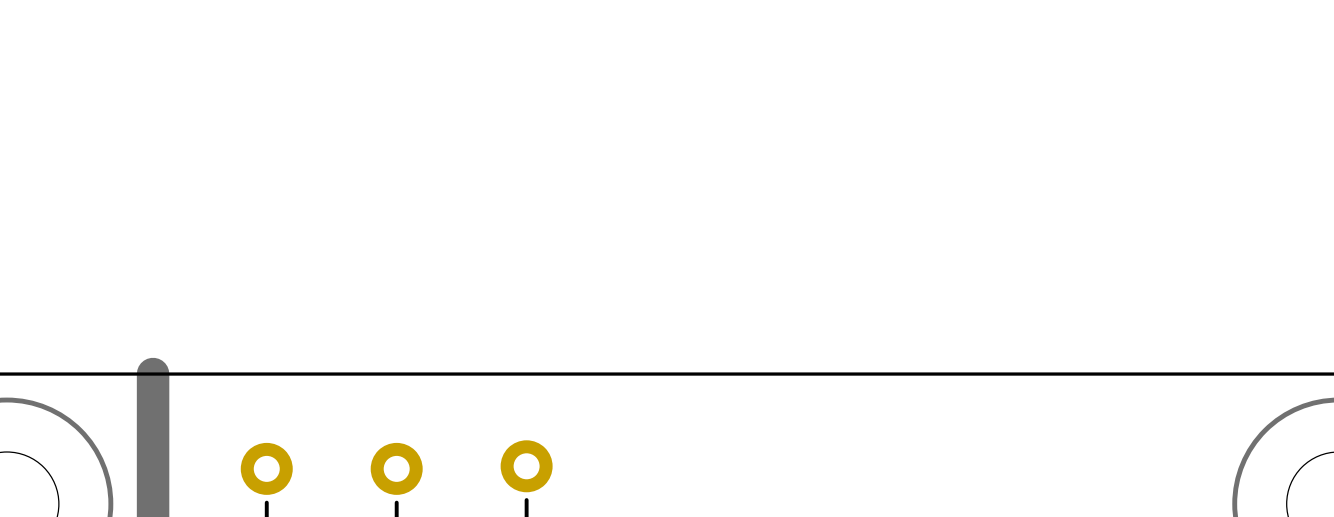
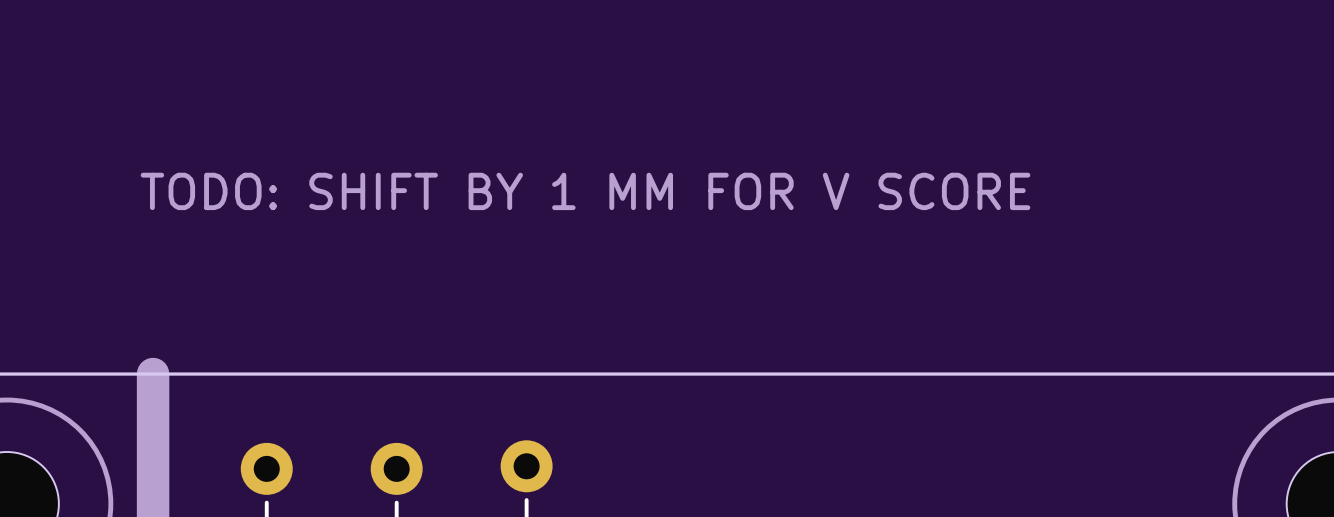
text: none -> TODO: SHIFT BY 1 MM FOR V SCORE (585, 191)

